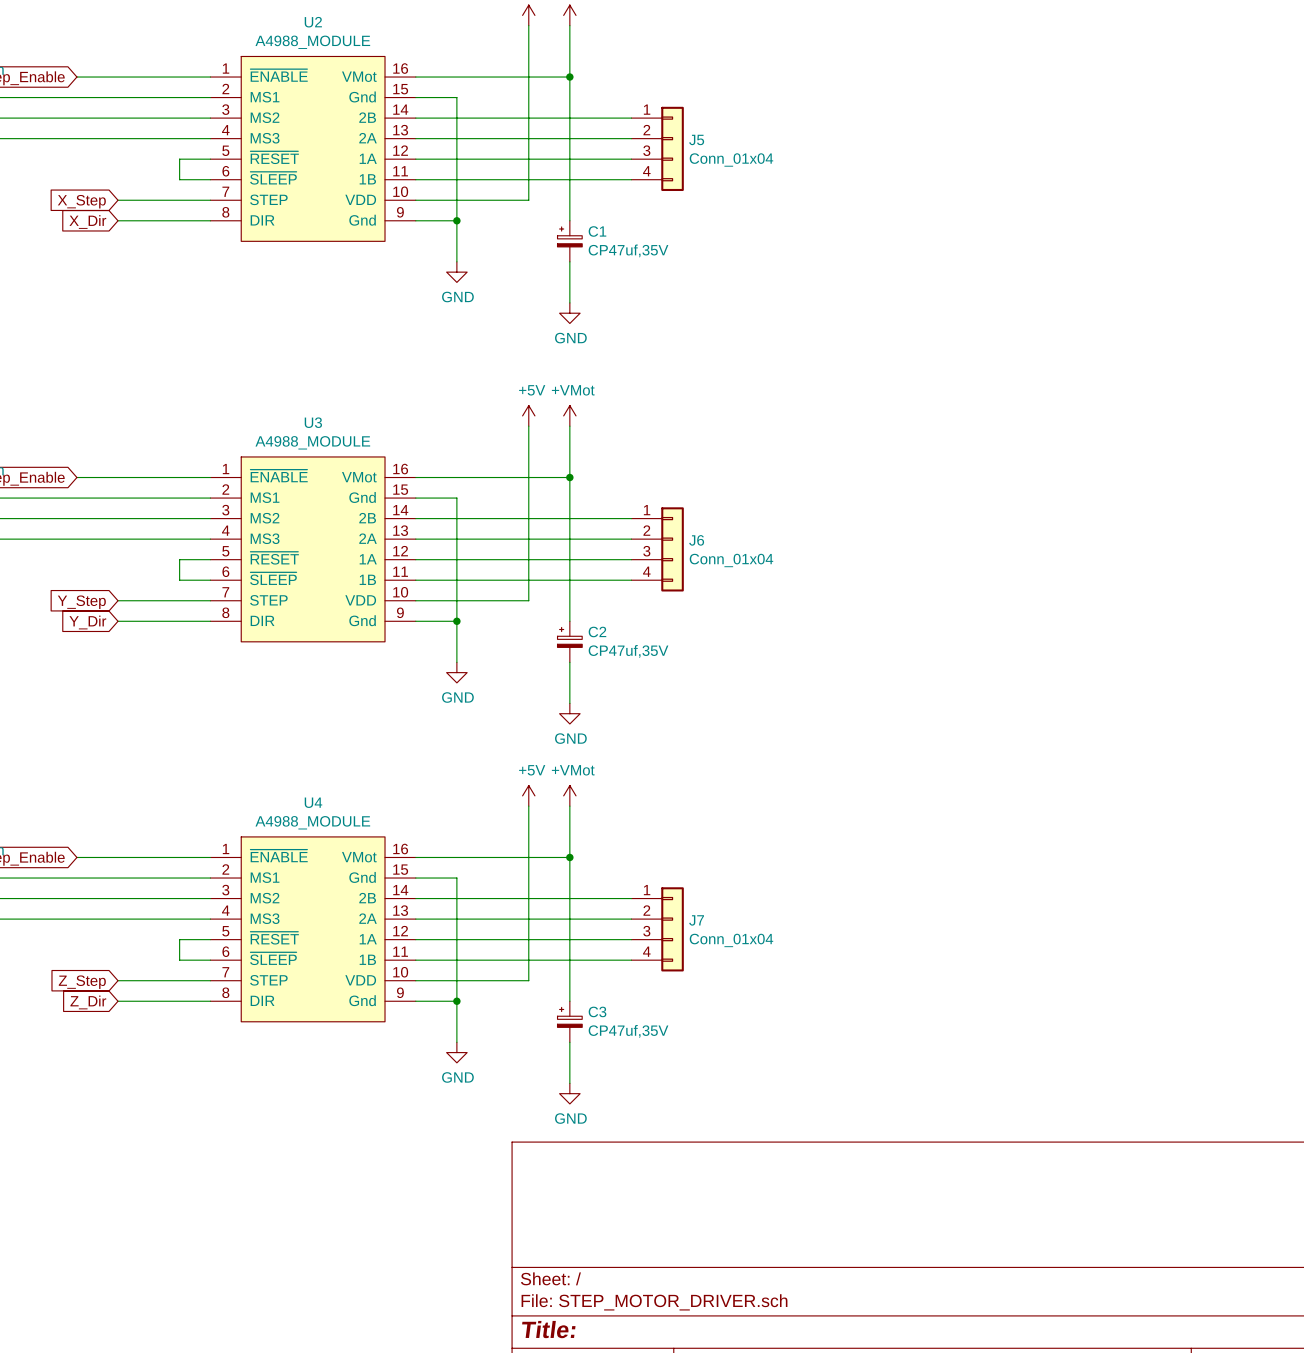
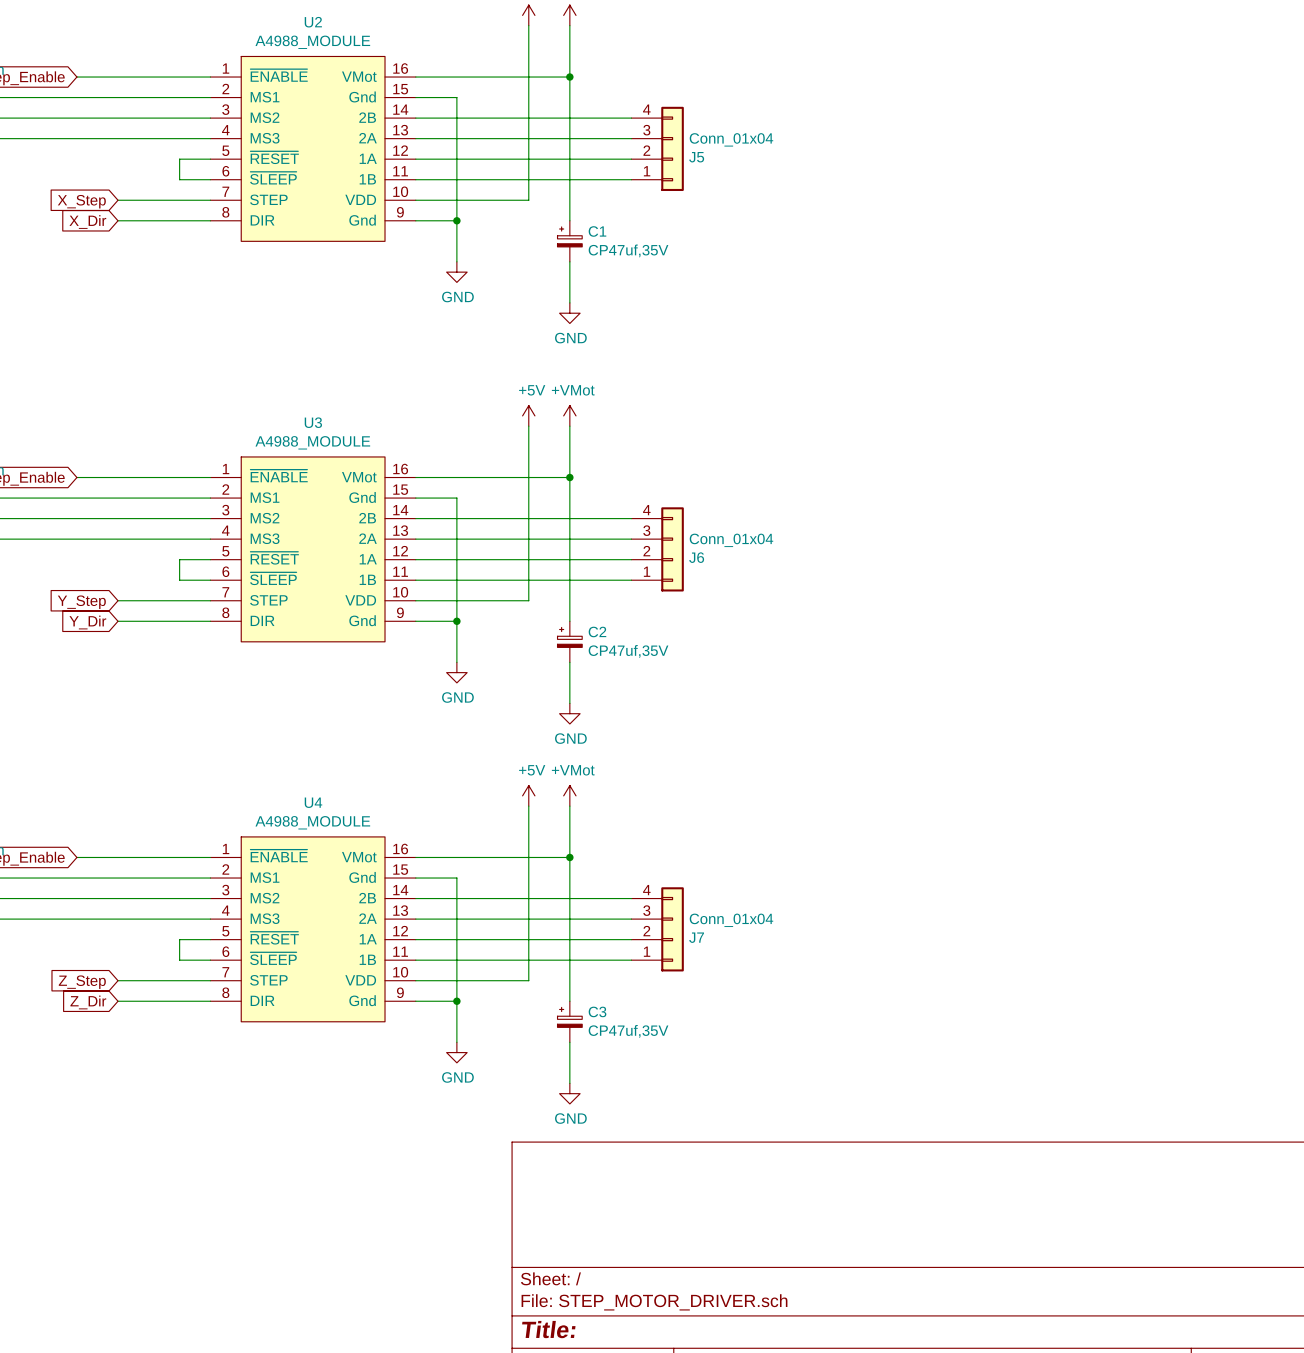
J5 flip: as is (672, 148) -> up-down (672, 148)
J6 flip: as is (672, 549) -> up-down (672, 549)
J7 flip: as is (672, 929) -> up-down (672, 929)

